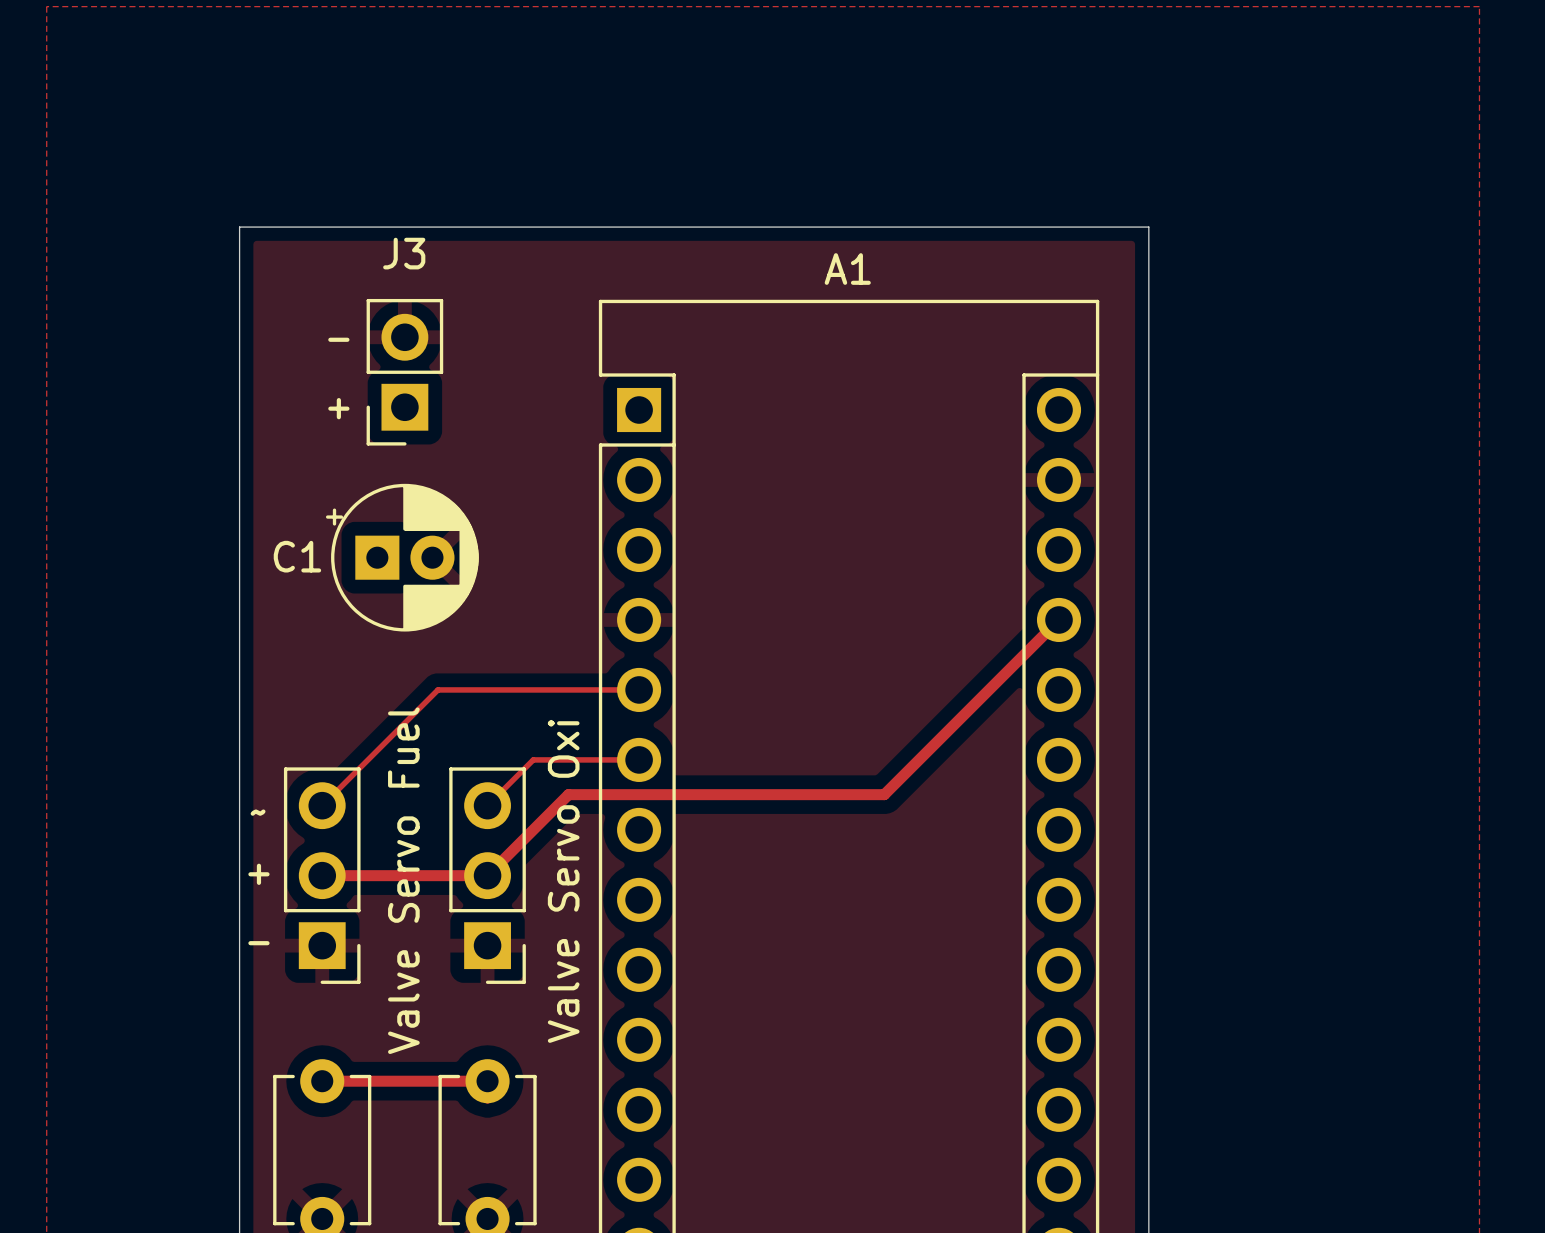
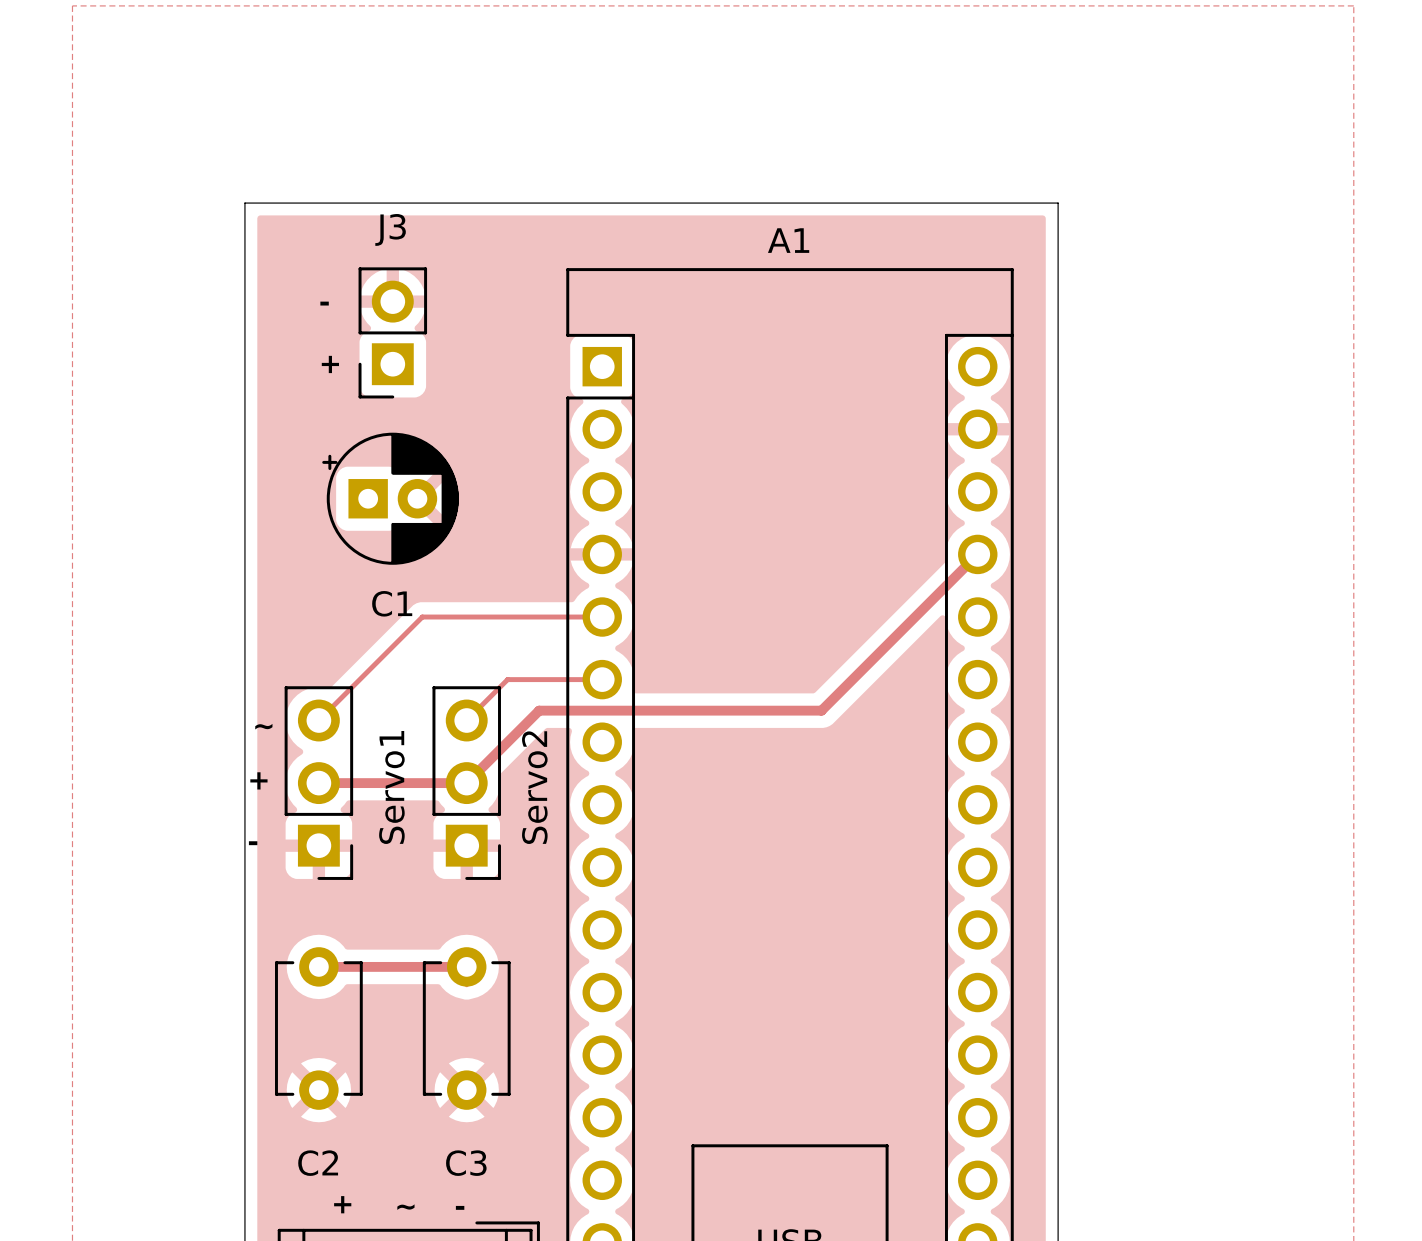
C1 name position: C1 (297, 556) -> C1 (392, 603)
Valve Servo Fuel name: Valve Servo Fuel (403, 880) -> Servo1 (391, 787)
Valve Servo Oxi name: Valve Servo Oxi (563, 881) -> Servo2 (534, 787)

